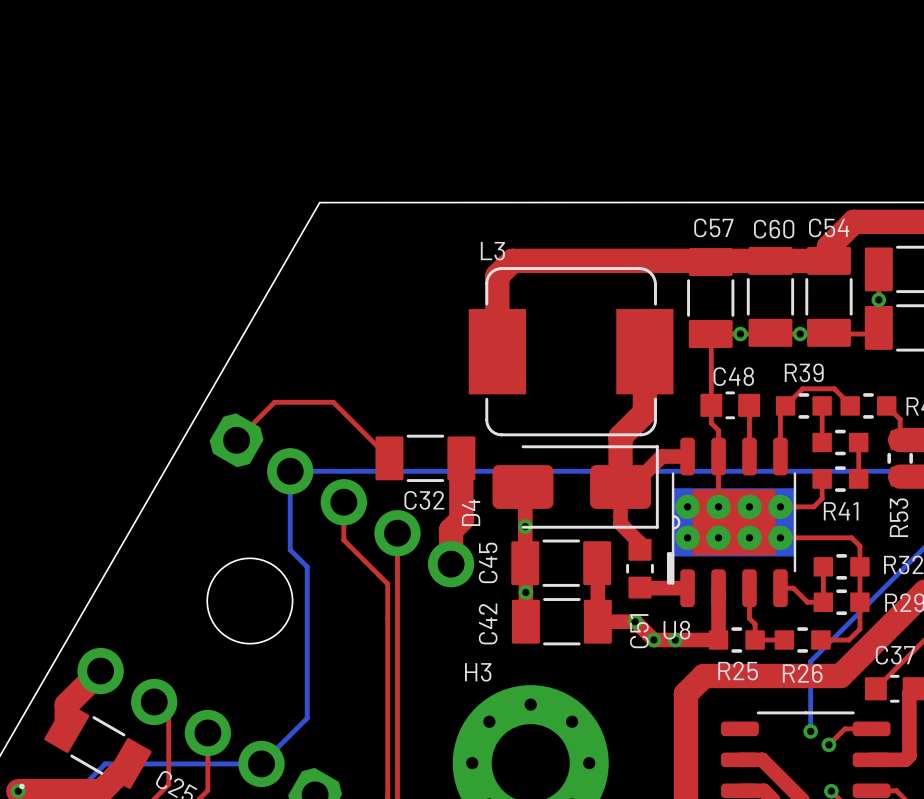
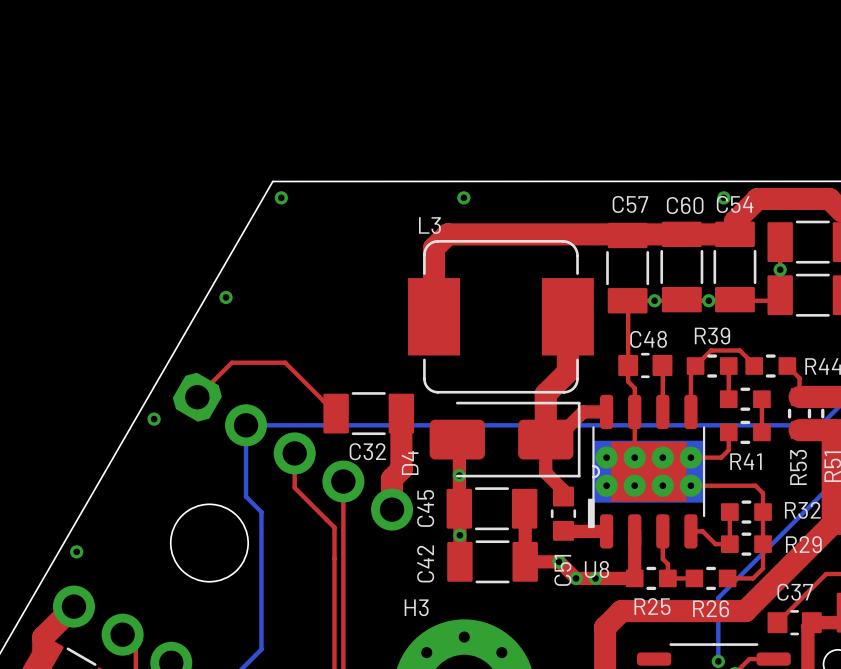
via: none -> (281, 197)
via: none -> (463, 197)
via: none -> (723, 197)
via: none -> (226, 297)
via: none -> (154, 419)
via: none -> (76, 551)

